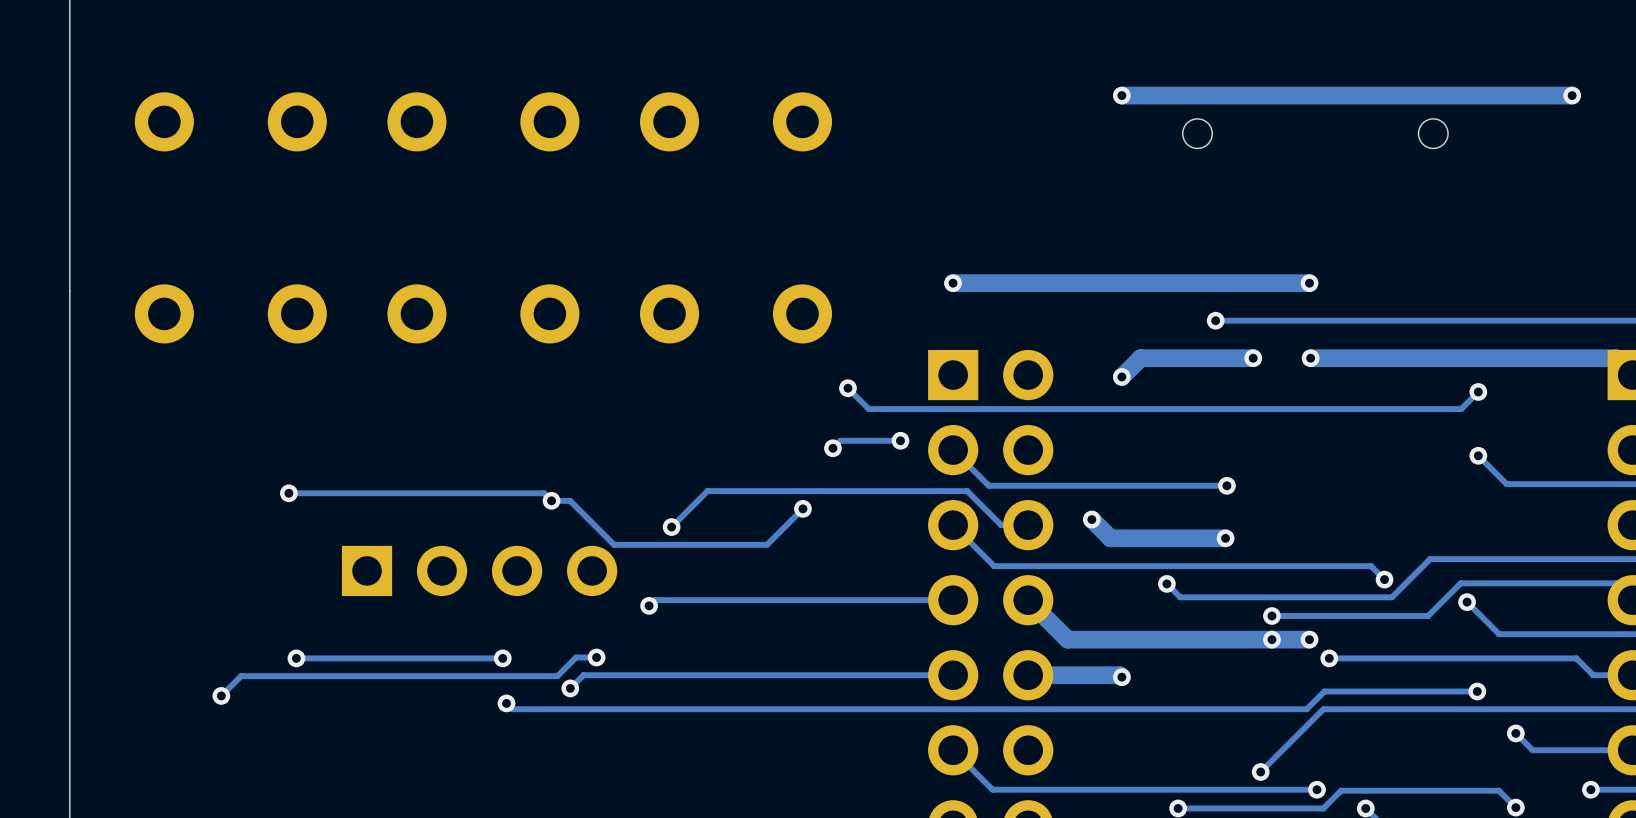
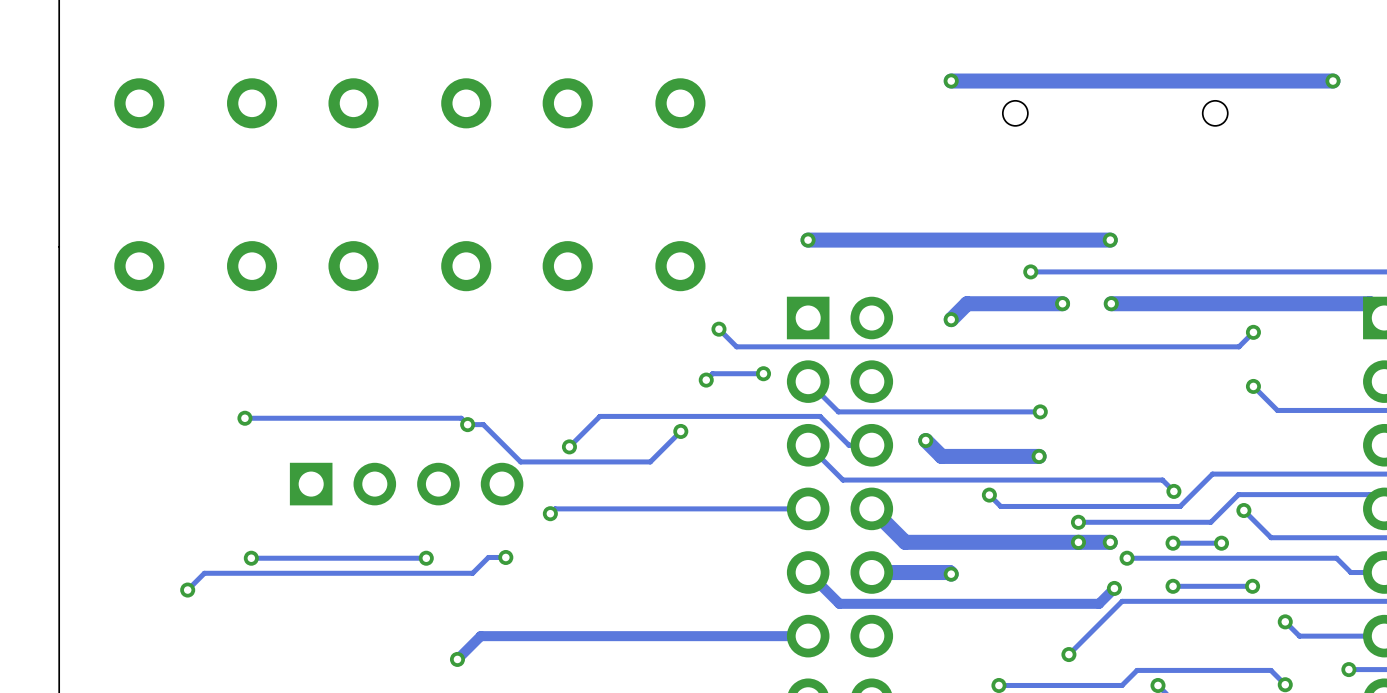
via: none -> (1173, 543)
track: none -> (1221, 543) (1173, 543)
via: none -> (1221, 543)
track: (953, 675) (583, 675) (570, 688) -> (808, 572) (839, 603) (1099, 603) (1114, 588)
via: (570, 688) -> none
track: (1383, 691) (1324, 691) (1306, 709) (512, 709) (506, 703) -> none
via: none -> (1173, 586)
via: none -> (1114, 588)
via: (506, 703) -> none
track: (953, 750) (992, 789) (1316, 789) -> (808, 636) (480, 636) (457, 659)
via: none -> (457, 659)
via: (1316, 789) -> none

